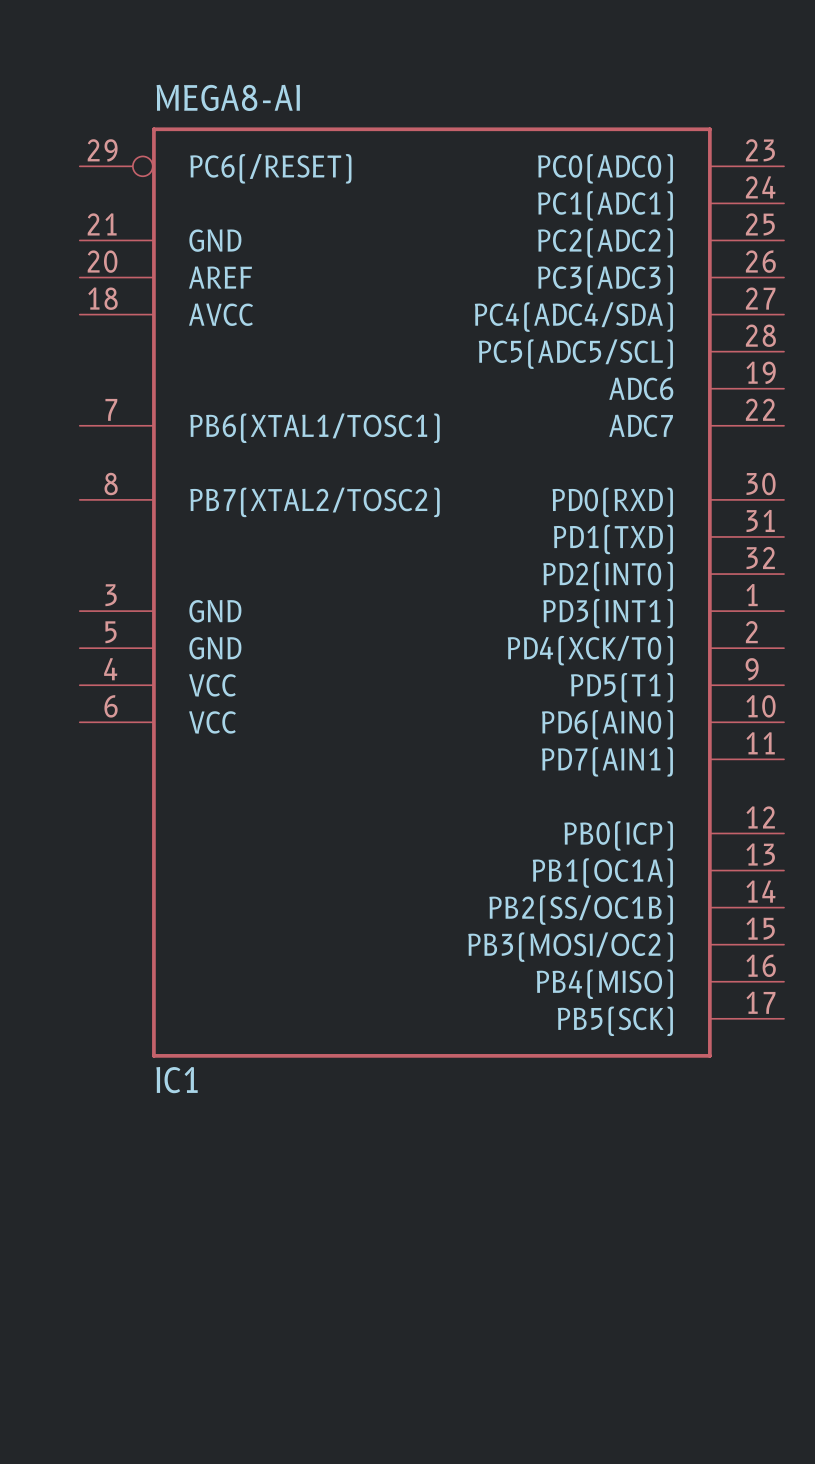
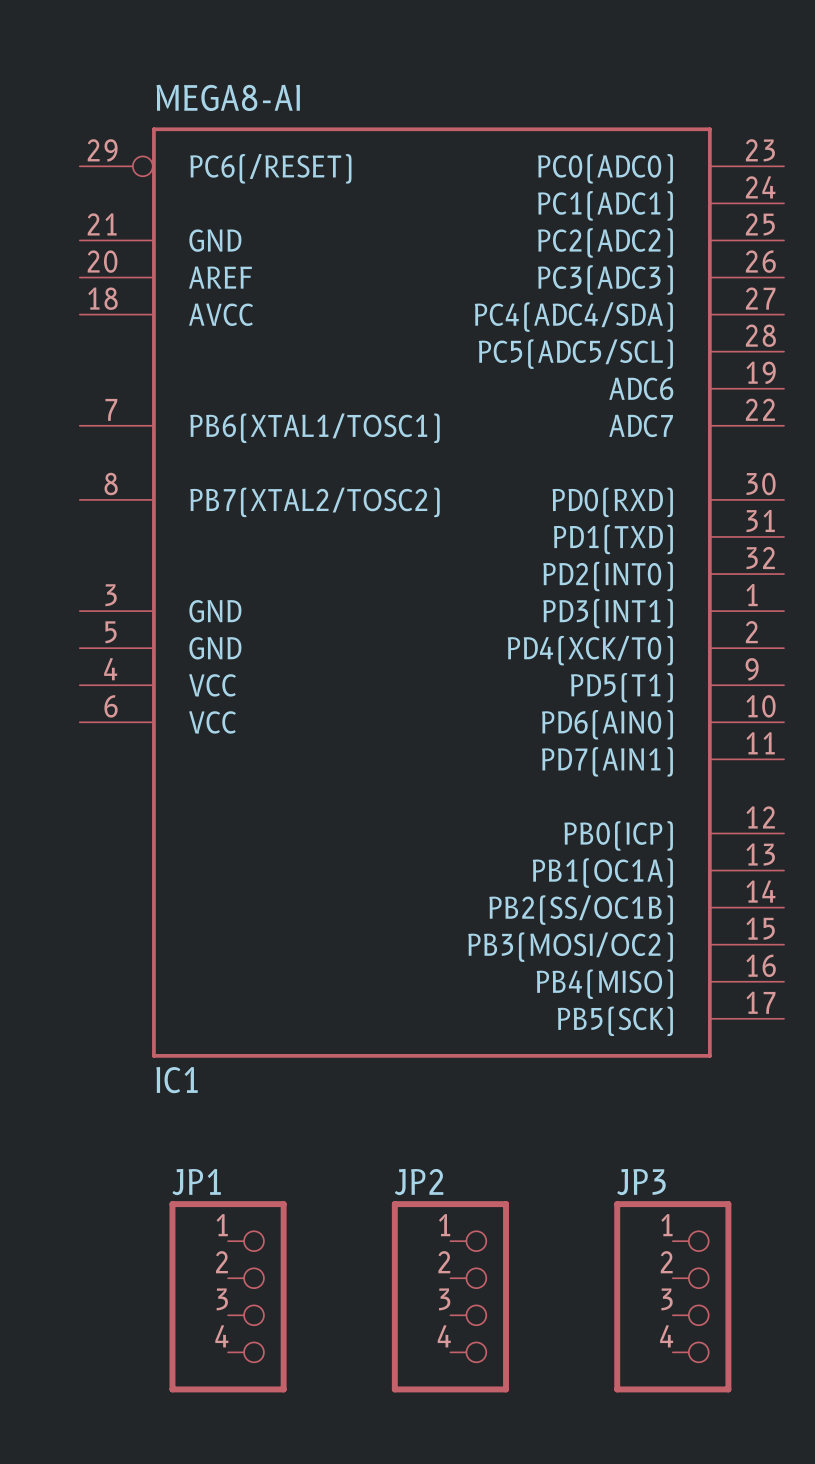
JP1: none -> (228, 1296)
JP2: none -> (450, 1296)
JP3: none -> (672, 1296)

